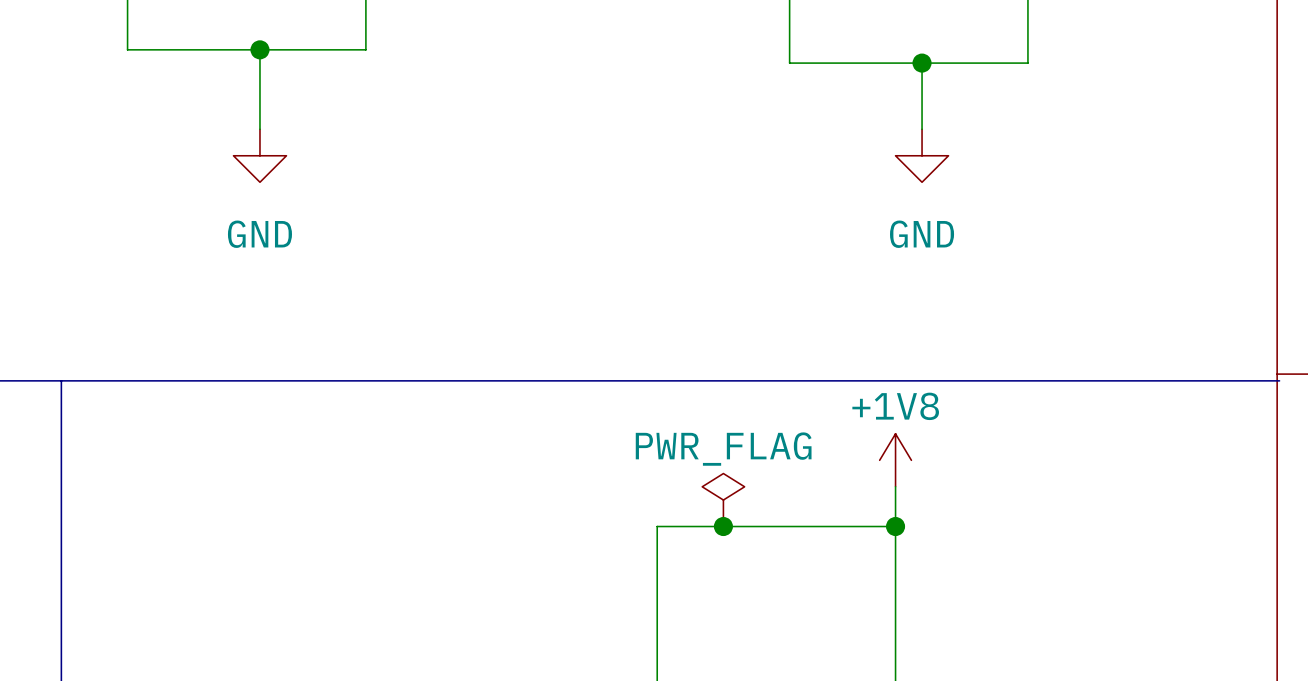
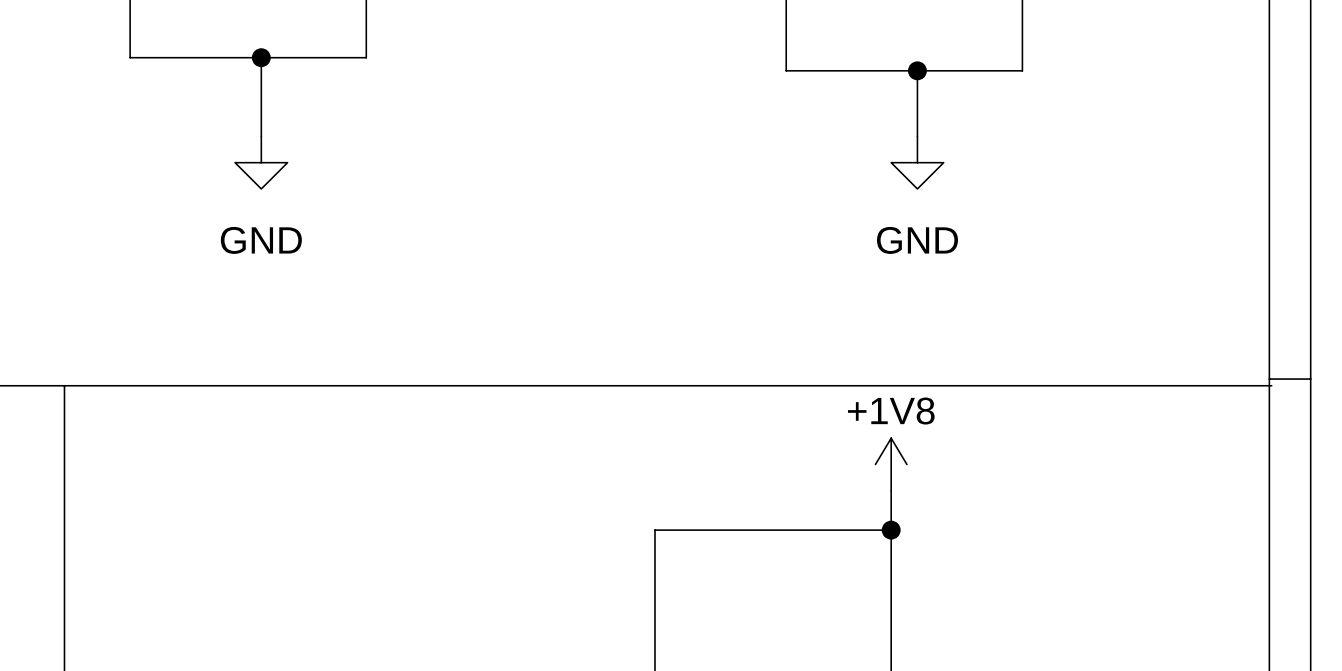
power symbol: PWR_FLAG (723, 500) -> none
junction: (723, 526) -> none

